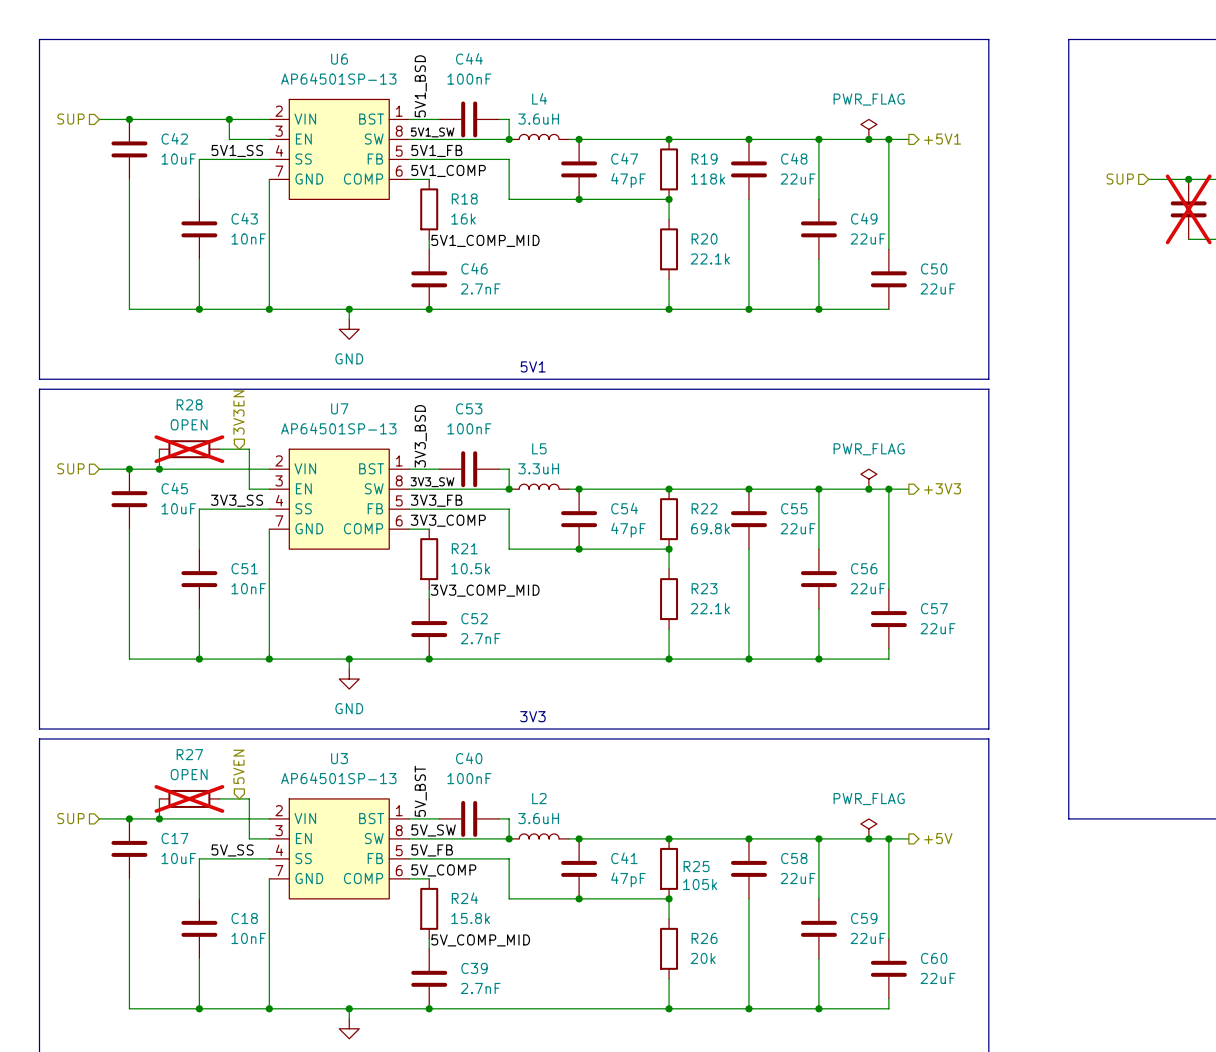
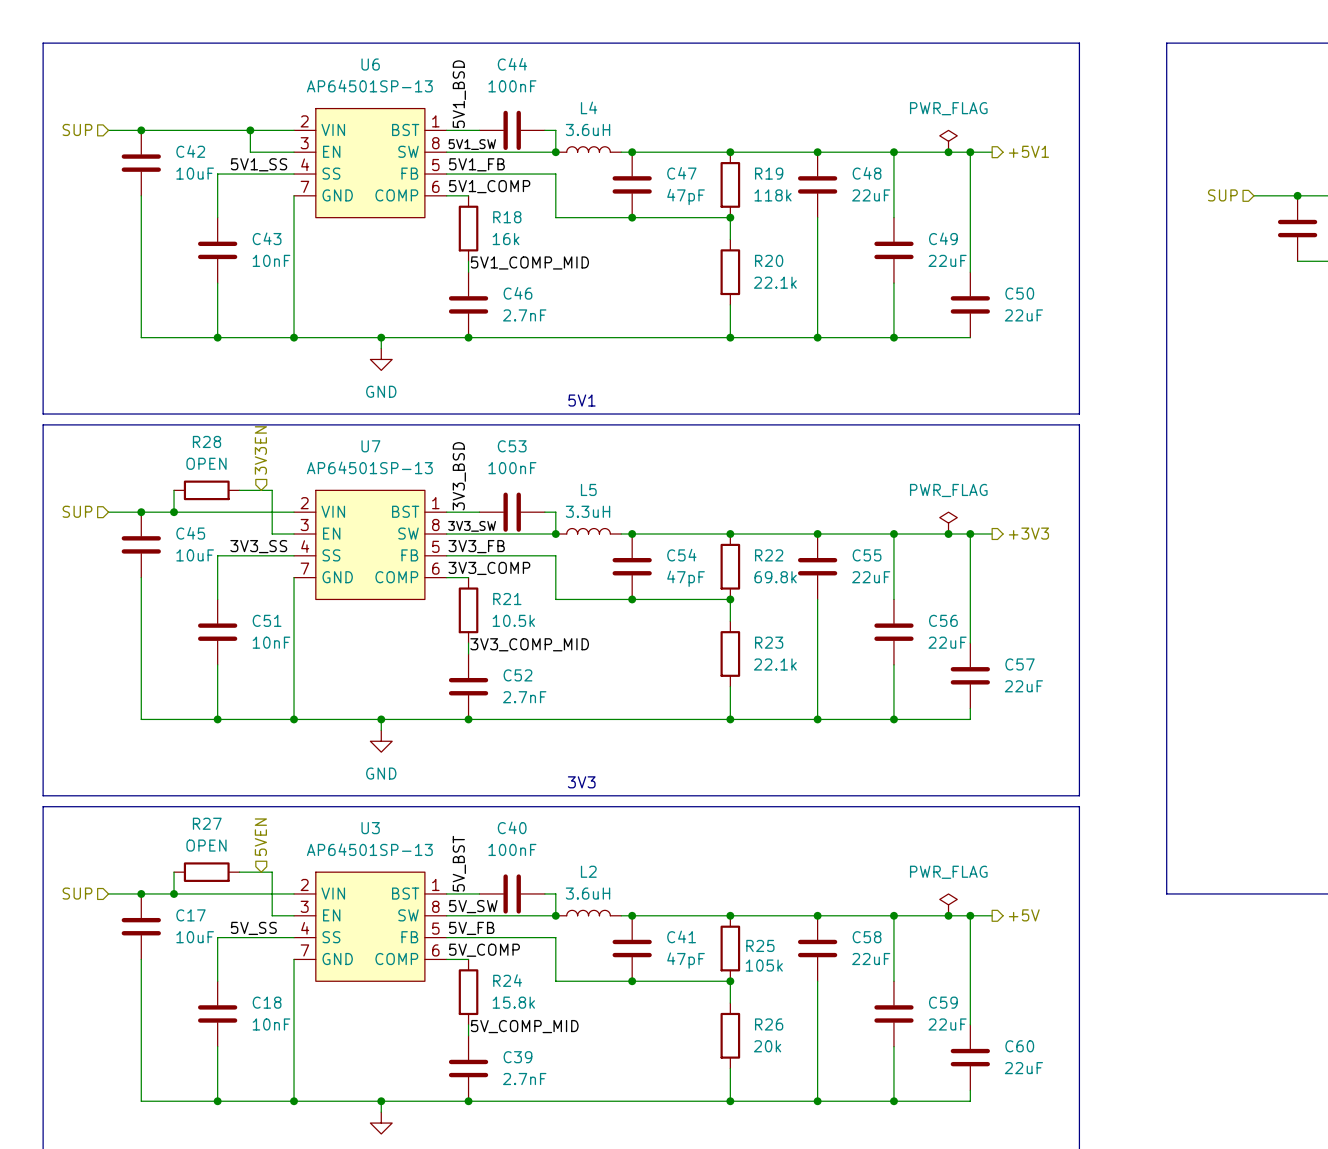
part do-not-place cross: (1188, 209) -> none
R28 do-not-place cross: (189, 449) -> none
R27 do-not-place cross: (189, 798) -> none

